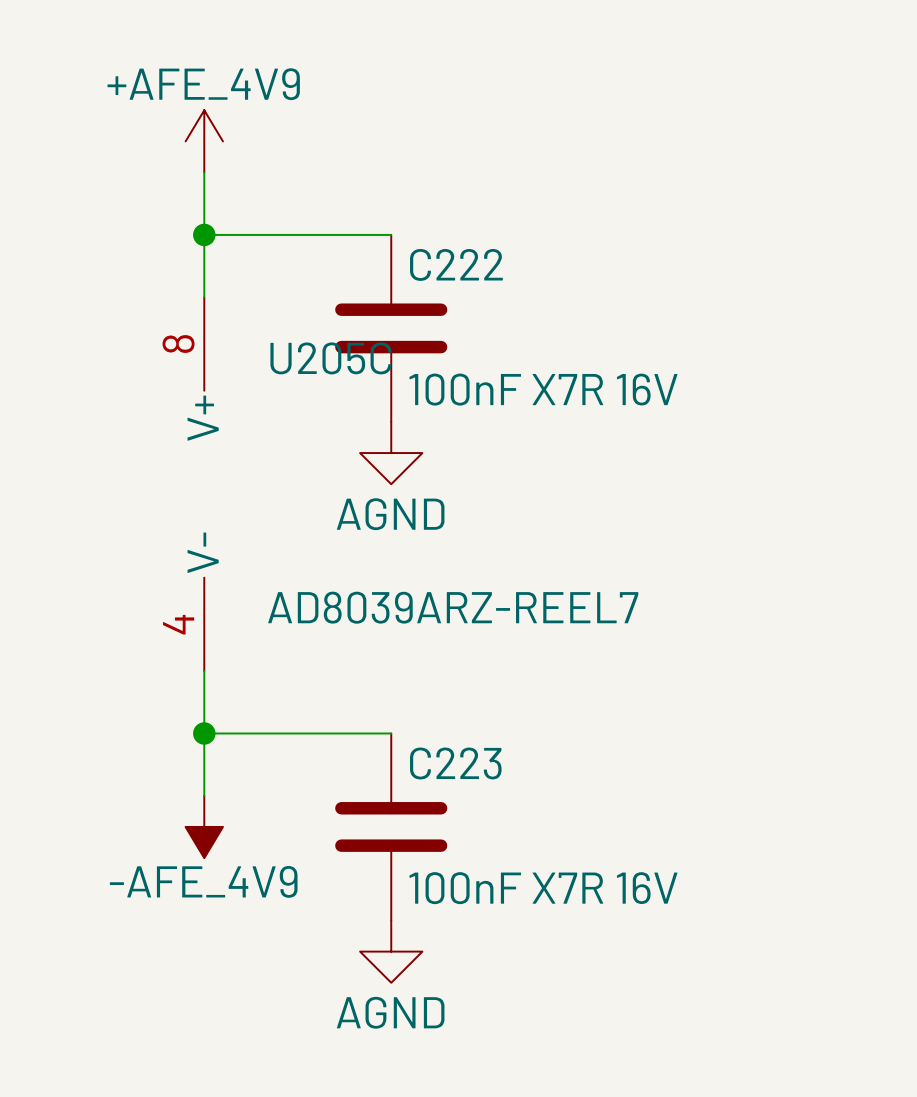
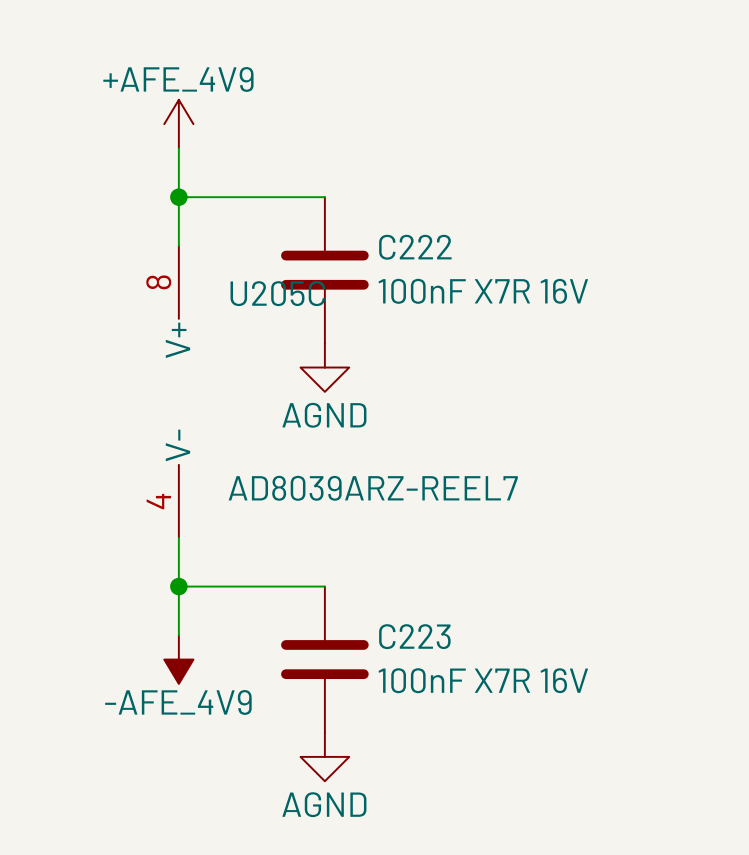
C222 name position: C222 (456, 264) -> C222 (415, 247)
C222 value position: 100nF X7R 16V (543, 389) -> 100nF X7R 16V (483, 291)
C223 name position: C223 (455, 763) -> C223 (414, 636)
C223 value position: 100nF X7R 16V (543, 888) -> 100nF X7R 16V (483, 680)

